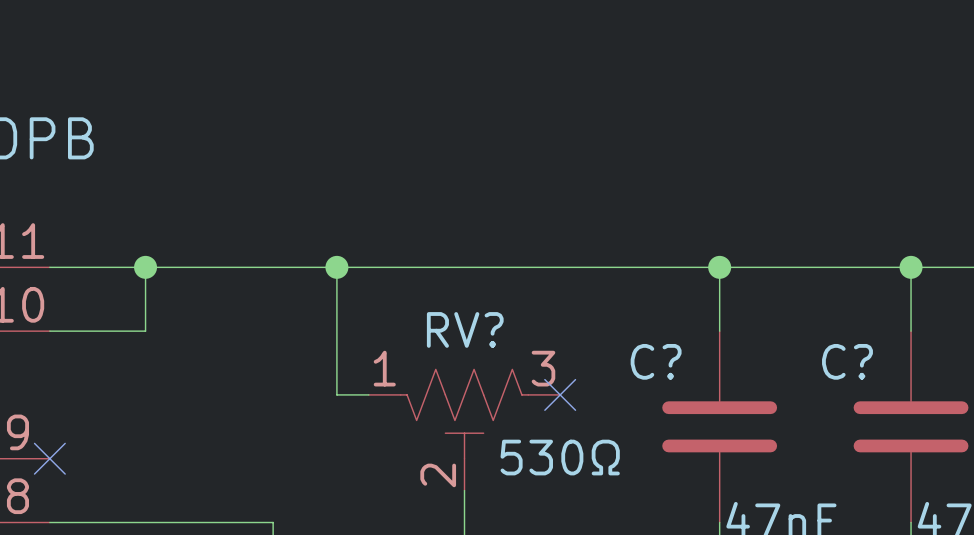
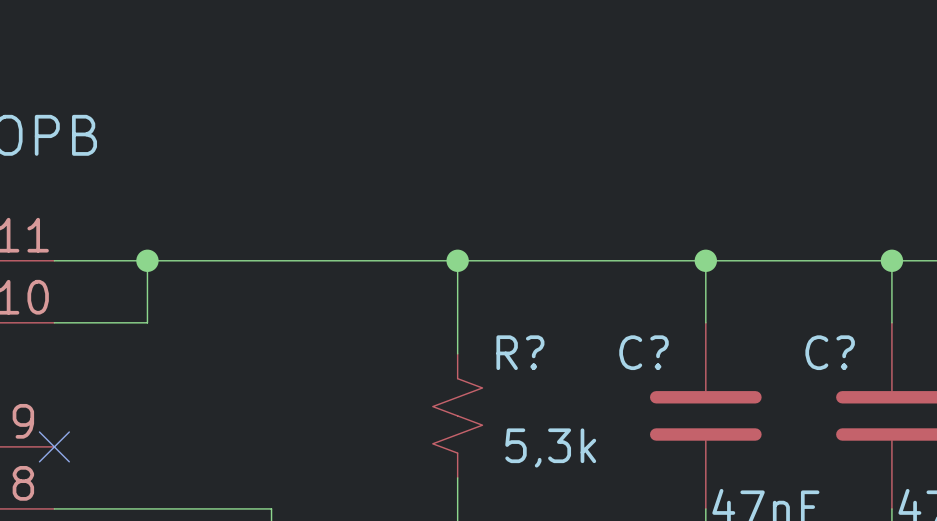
wire: (336, 267) (336, 394) (368, 394) -> none
junction position: (336, 267) -> (457, 260)
wire: none -> (457, 260) (457, 353)
no-connect mark: (560, 394) -> none
R?: none -> 5,3k (457, 415)
RV?: 530Ω (464, 430) -> none

